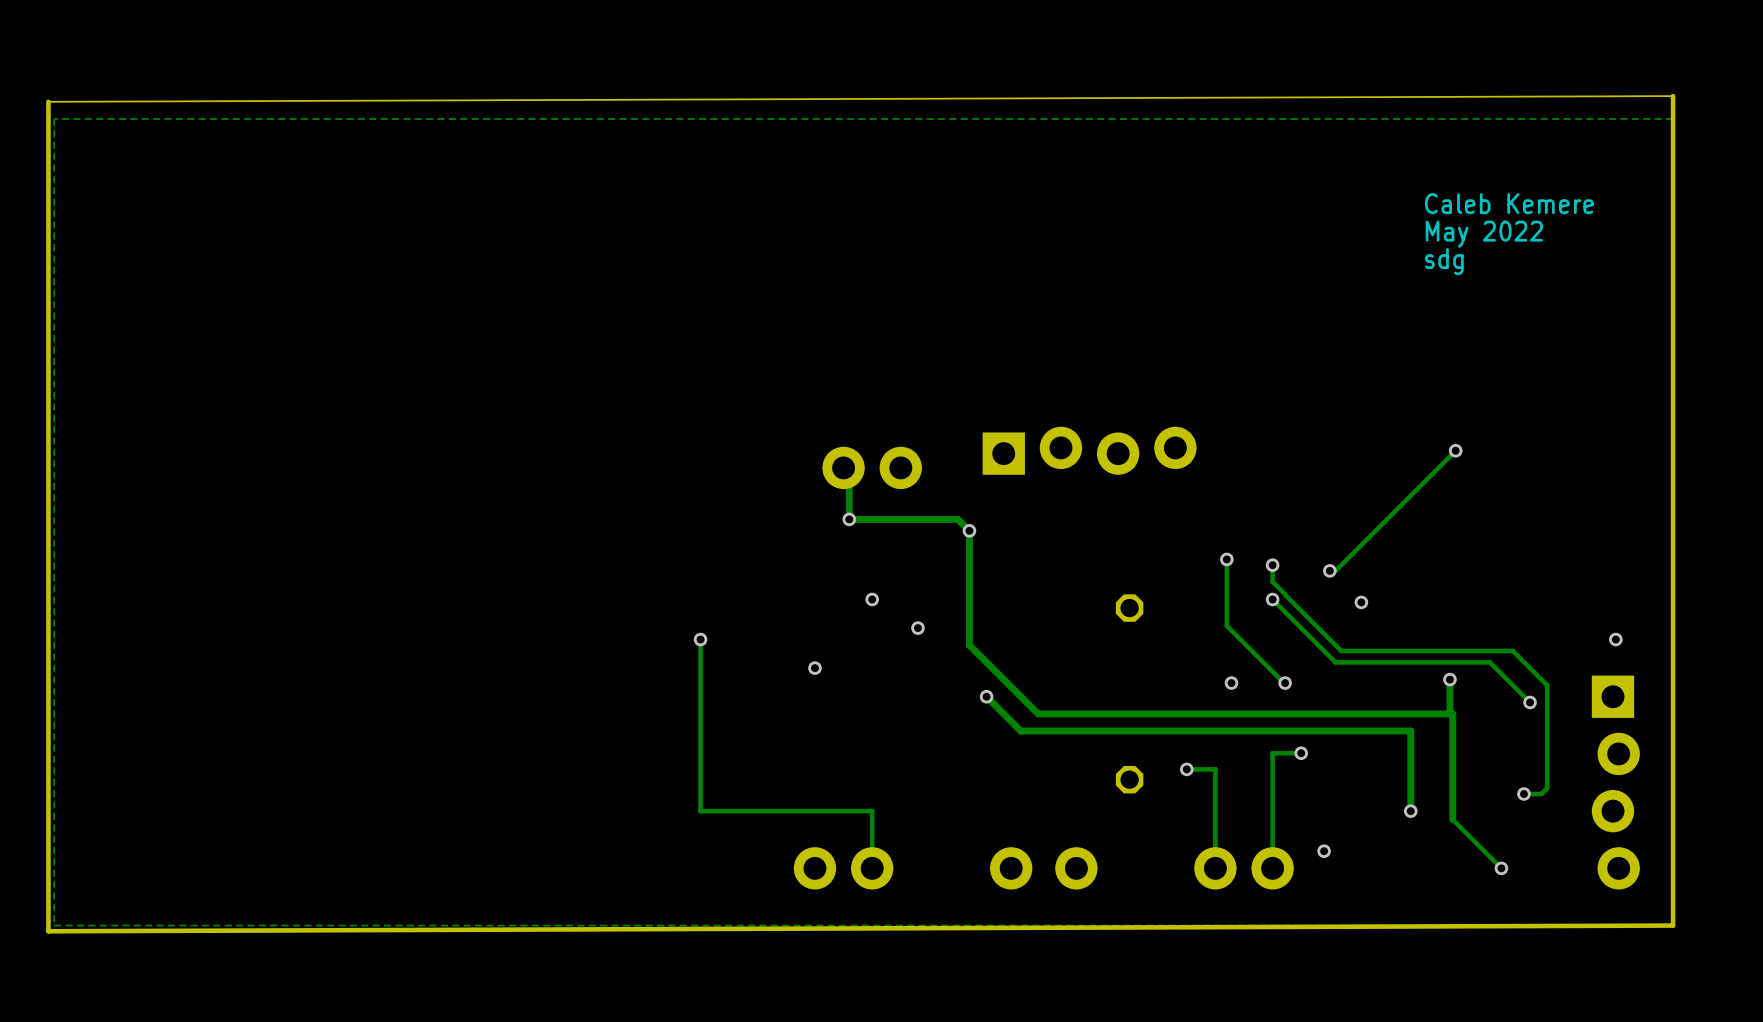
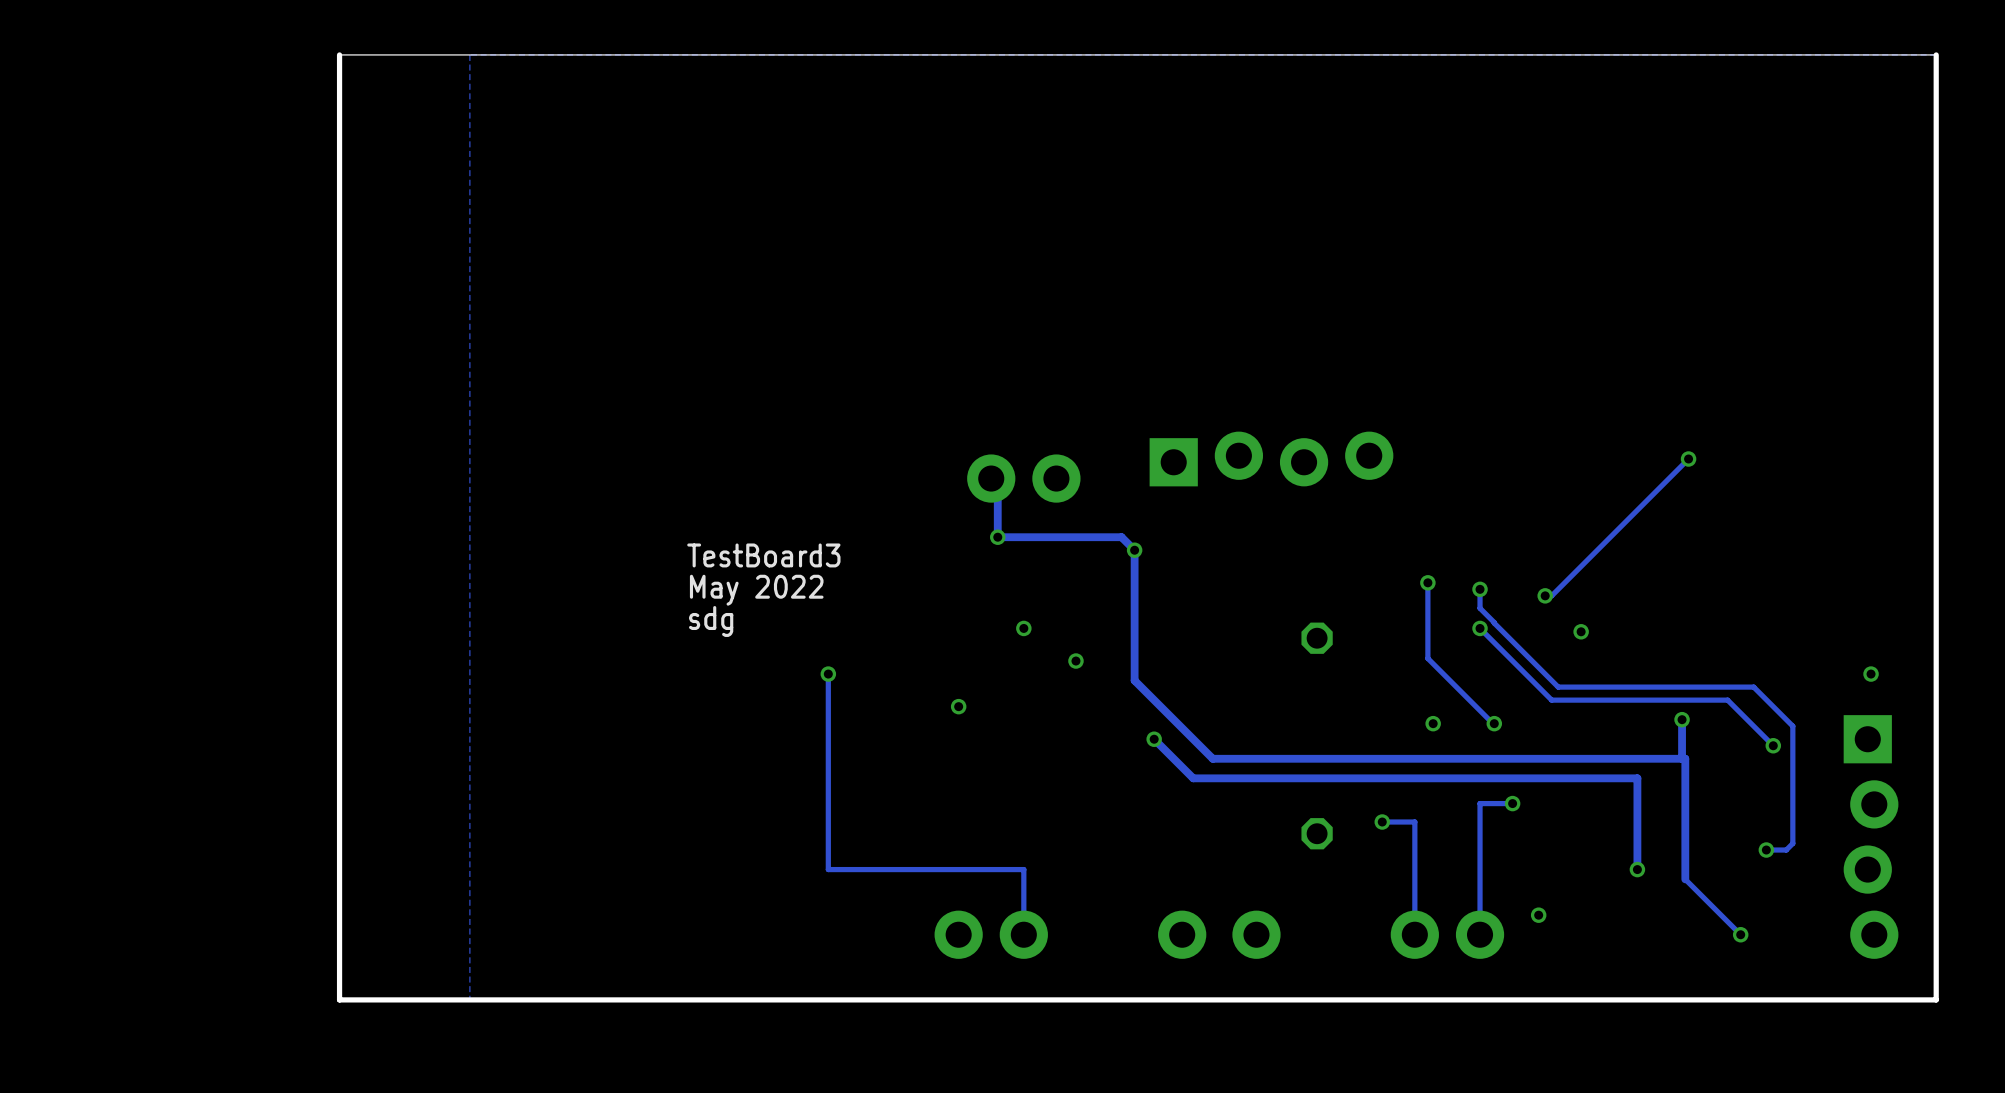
board edge: (1673, 96) (48, 101) (48, 931) (1673, 925) -> (1936, 54) (339, 54) (339, 999) (1936, 999)
zone outline: (1673, 118) (54, 118) (54, 925) (385, 925) -> (1936, 81) (1936, 54) (469, 54) (469, 999)
text: Caleb Kemere (1509, 203) -> none
text: May 2022 (1484, 234) -> none
text: sdg (1444, 261) -> none
text: none -> TestBoard3 (763, 555)
text: none -> May 2022 (756, 590)
text: none -> sdg (711, 621)

